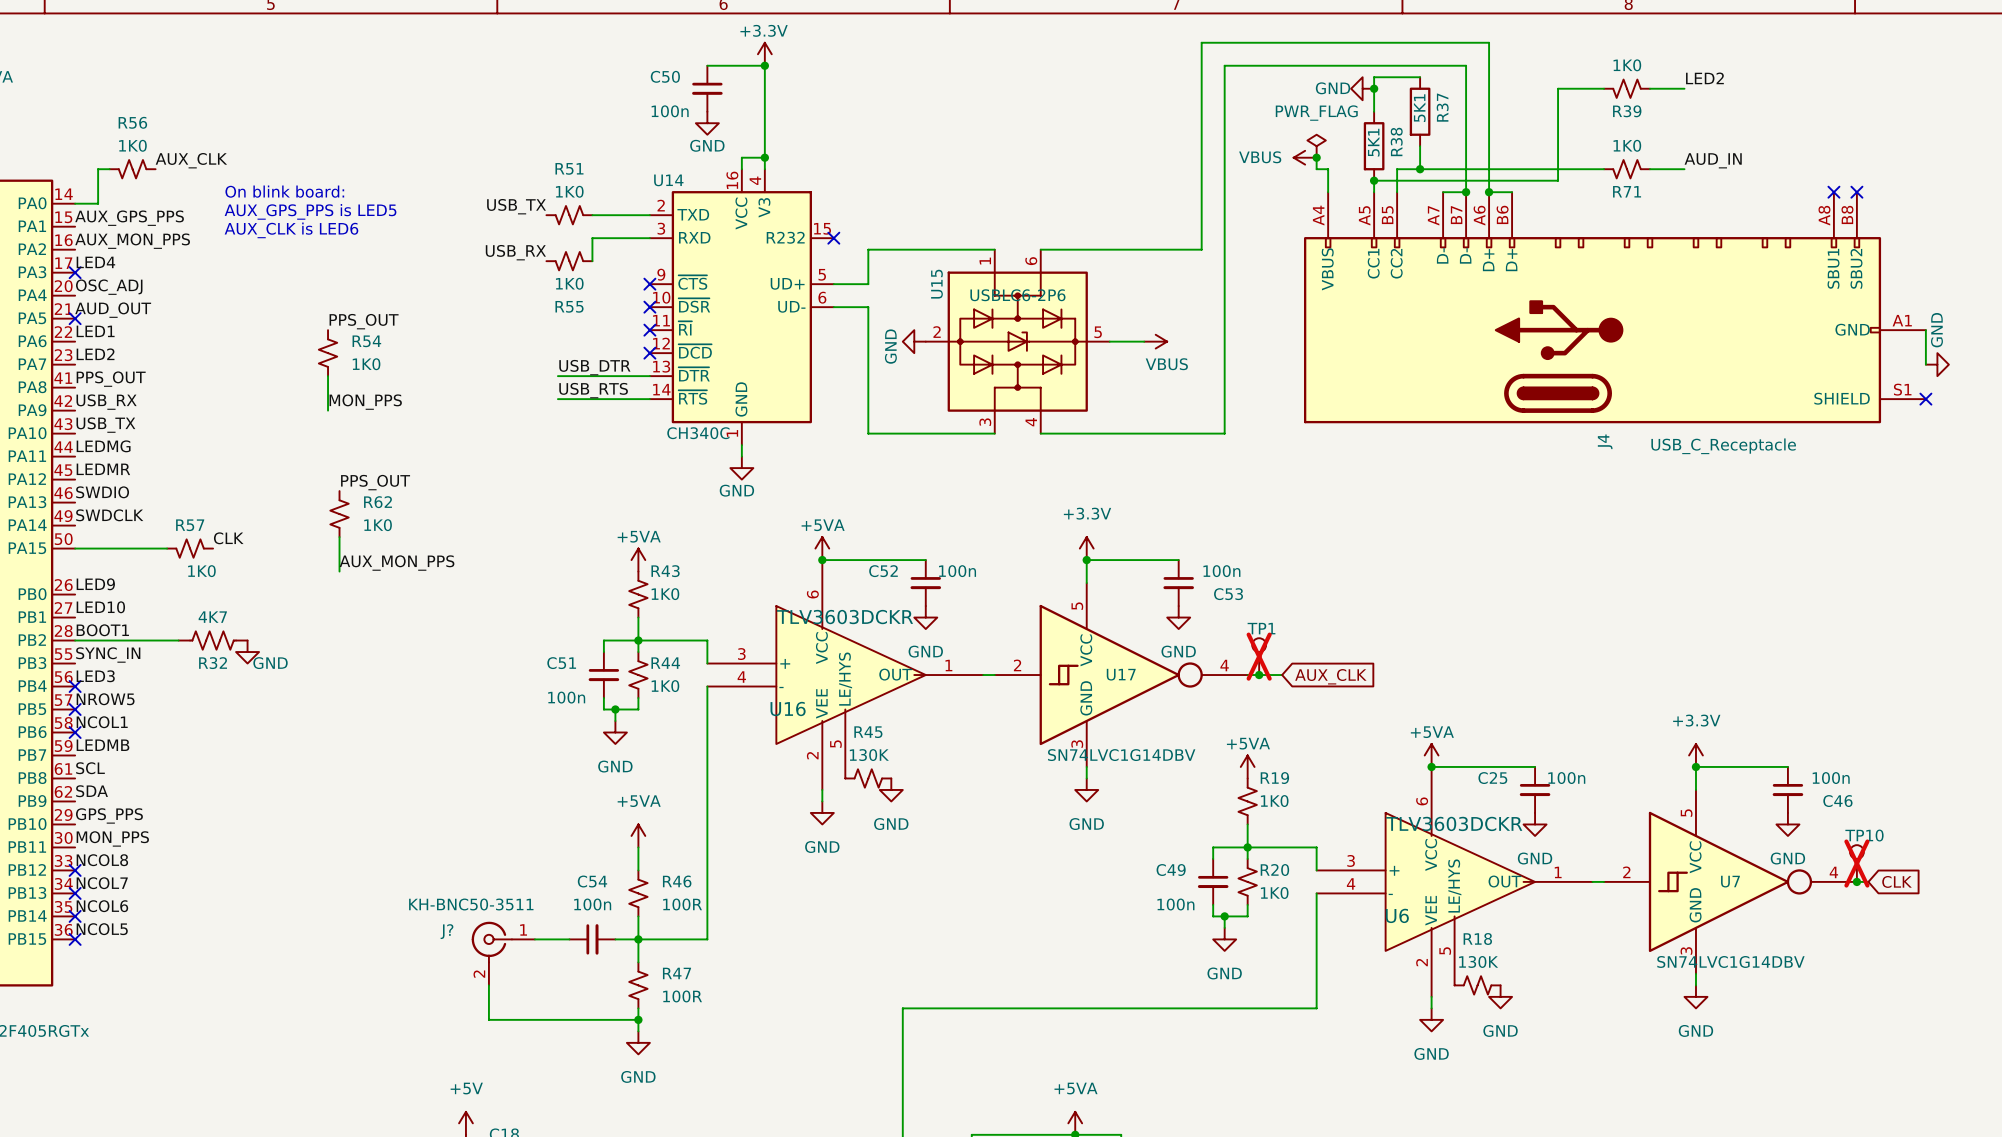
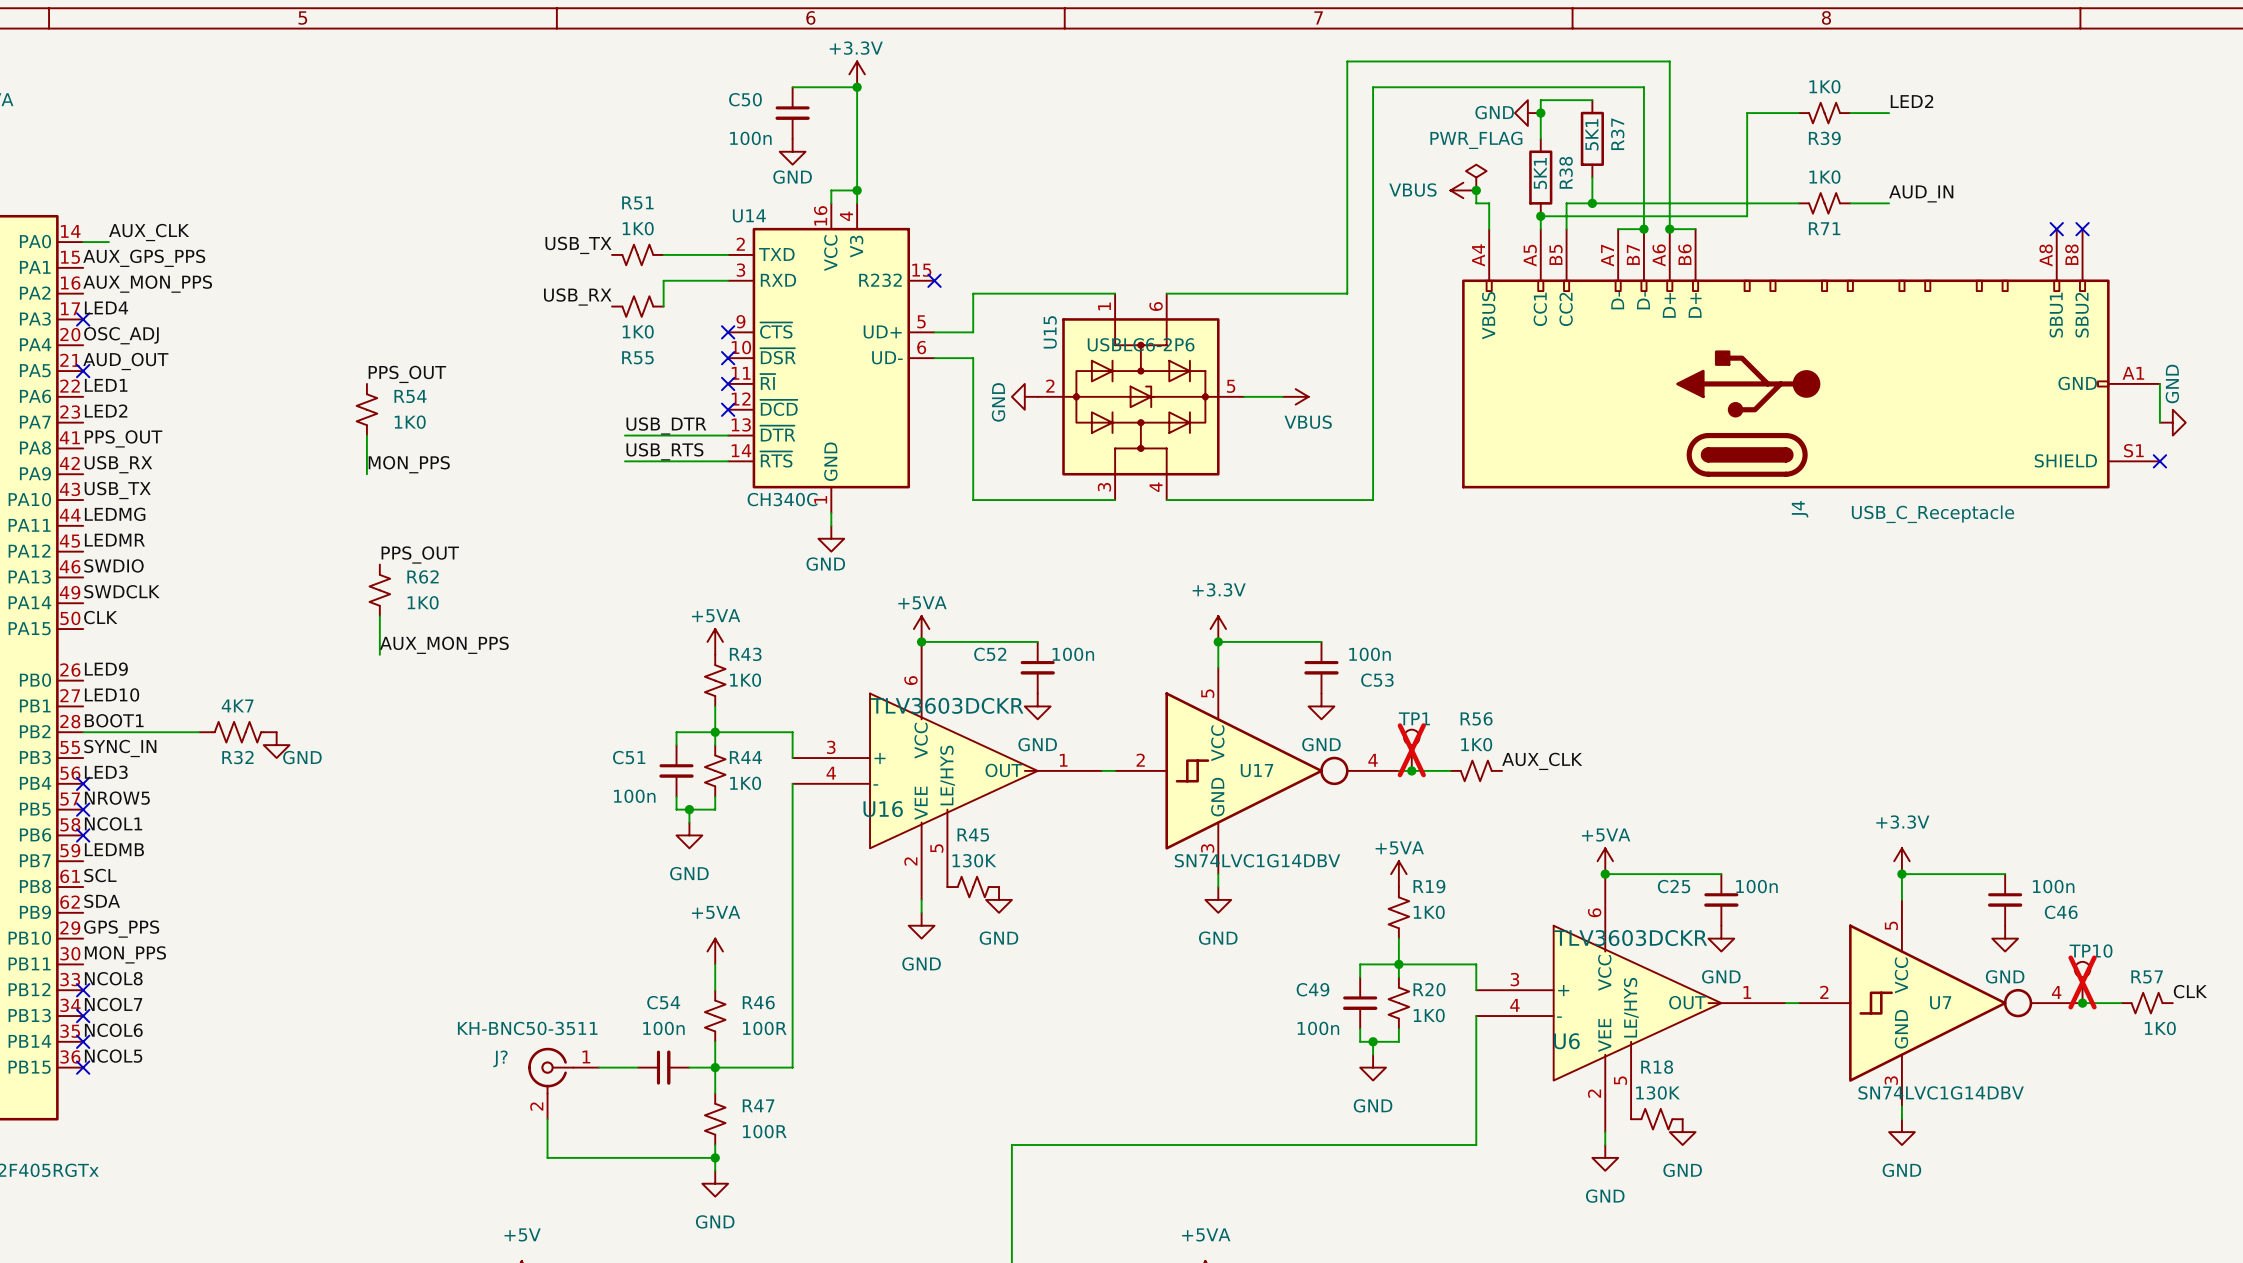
label position: AUX_CLK (191, 160) -> AUX_CLK (149, 232)
wire: (109, 169) (98, 169) (98, 203) -> none
R56 position: (132, 169) -> (1476, 770)
text: On blink board: (284, 191) -> none
text: AUX_GPS_PPS is LED5 (310, 211) -> none
text: AUX_CLK is LED6 (291, 230) -> none
label position: CLK (228, 538) -> CLK (100, 617)
wire: (75, 548) (167, 548) -> none
R57 position: (190, 548) -> (2147, 1003)
label: none -> AUX_CLK (1542, 761)
wire: none -> (1437, 770) (1450, 770)
global label: AUX_CLK (1330, 676) -> none
label: none -> CLK (2190, 991)
wire: none -> (2095, 1003) (2121, 1003)
global label: CLK (1897, 881) -> none

